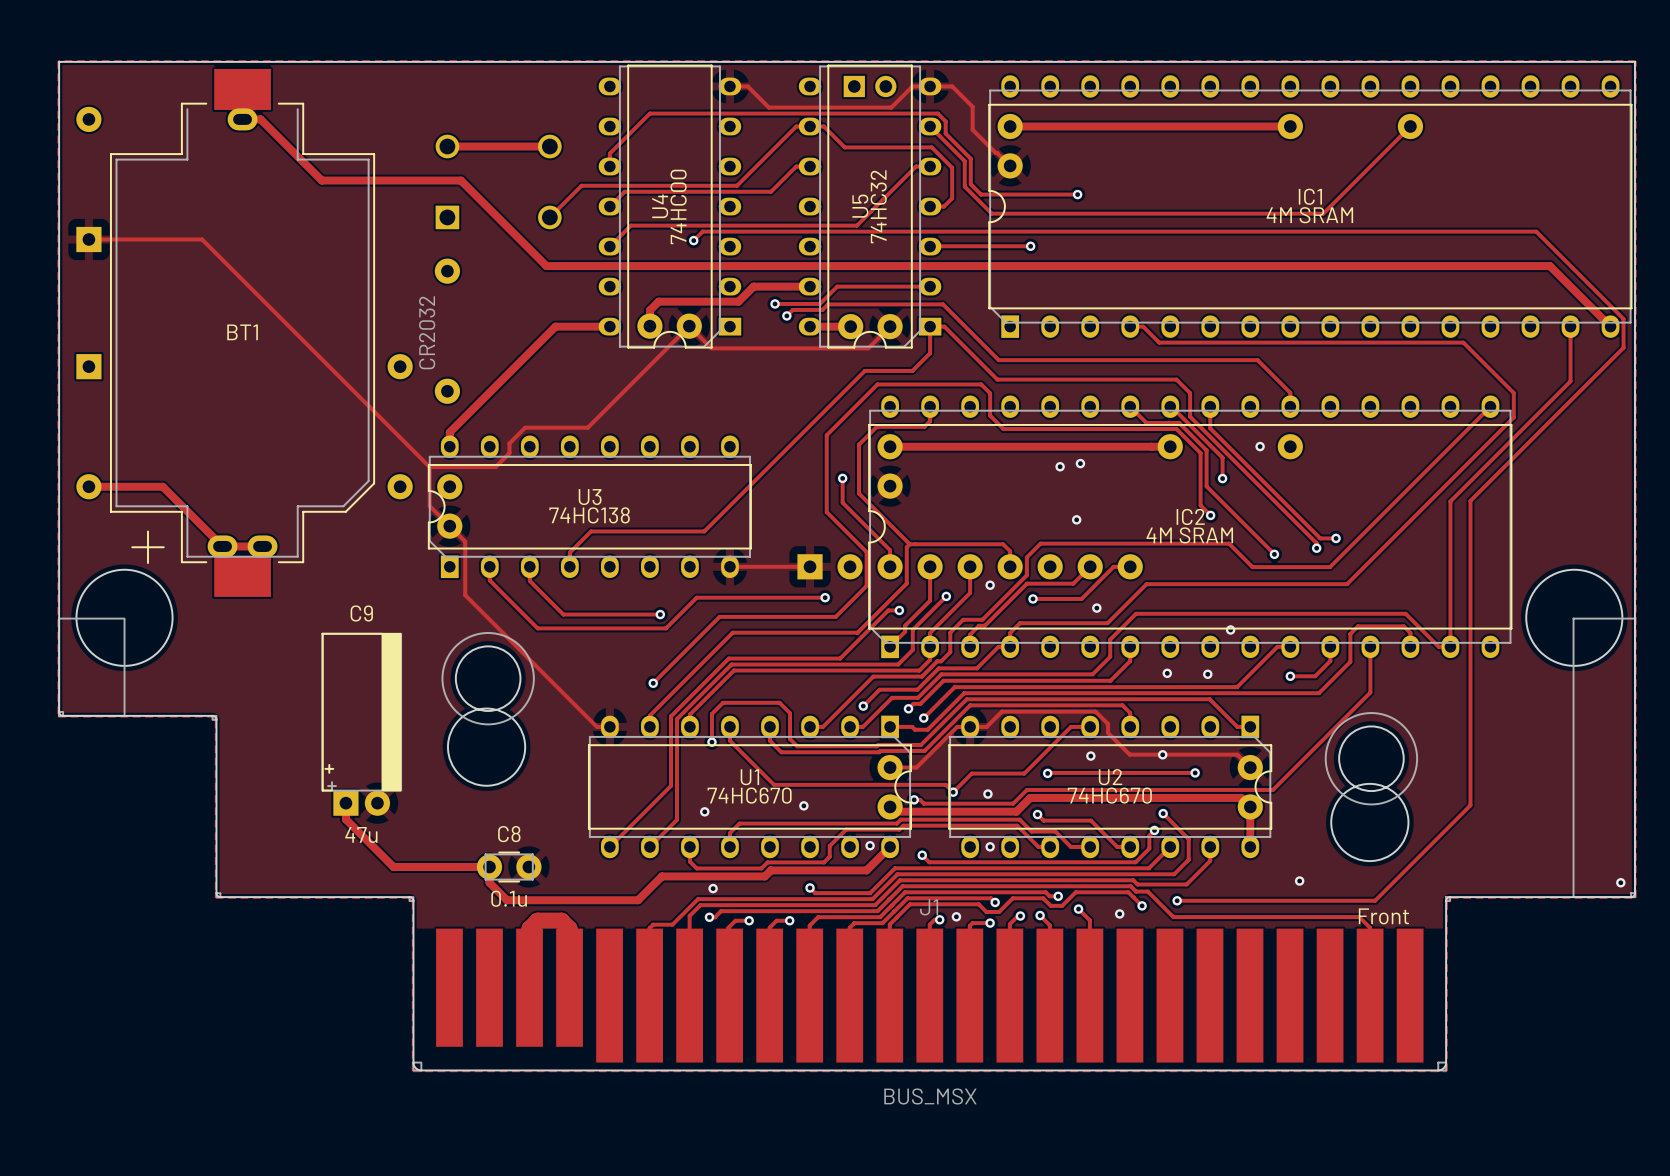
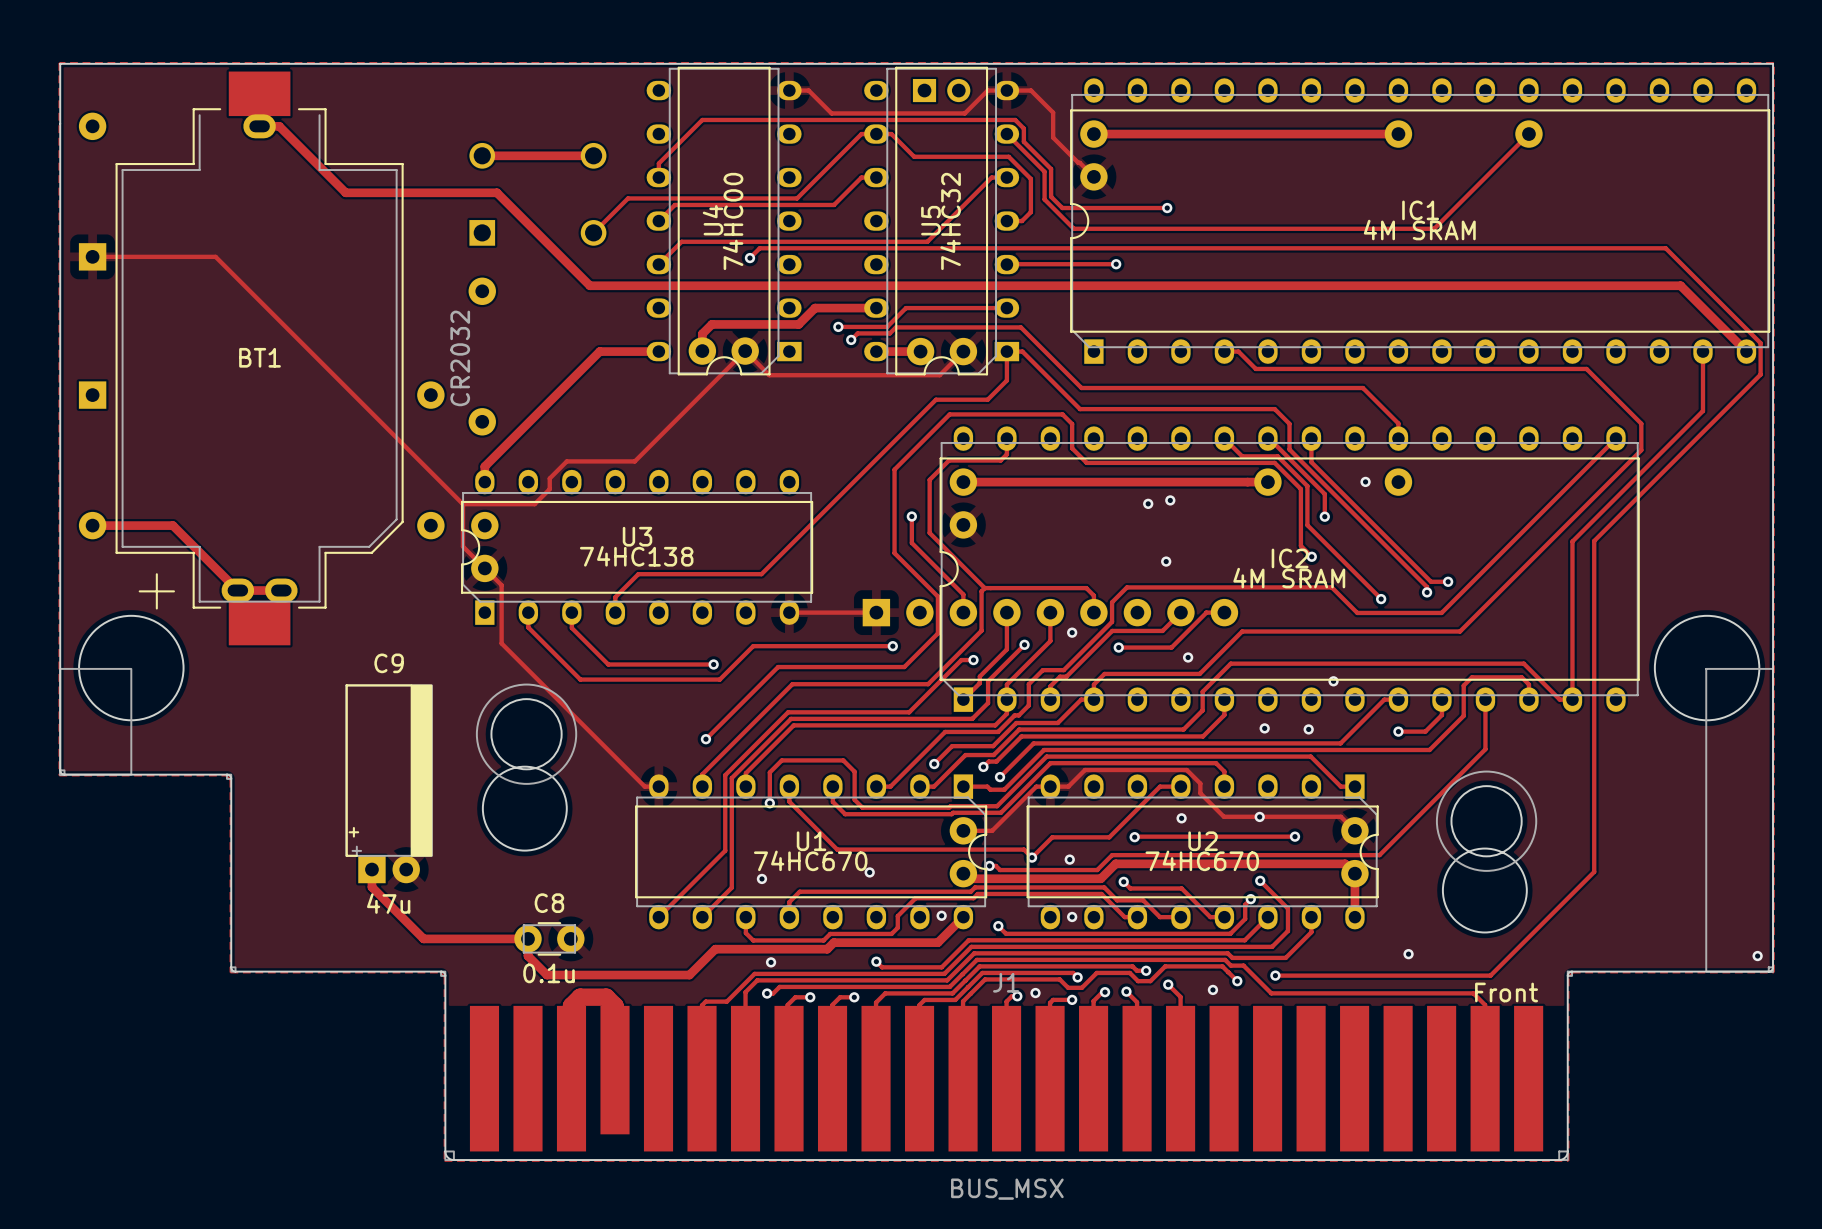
J1 footprint: [58, 116, 1636, 1072] -> [59, 122, 1774, 1161]

